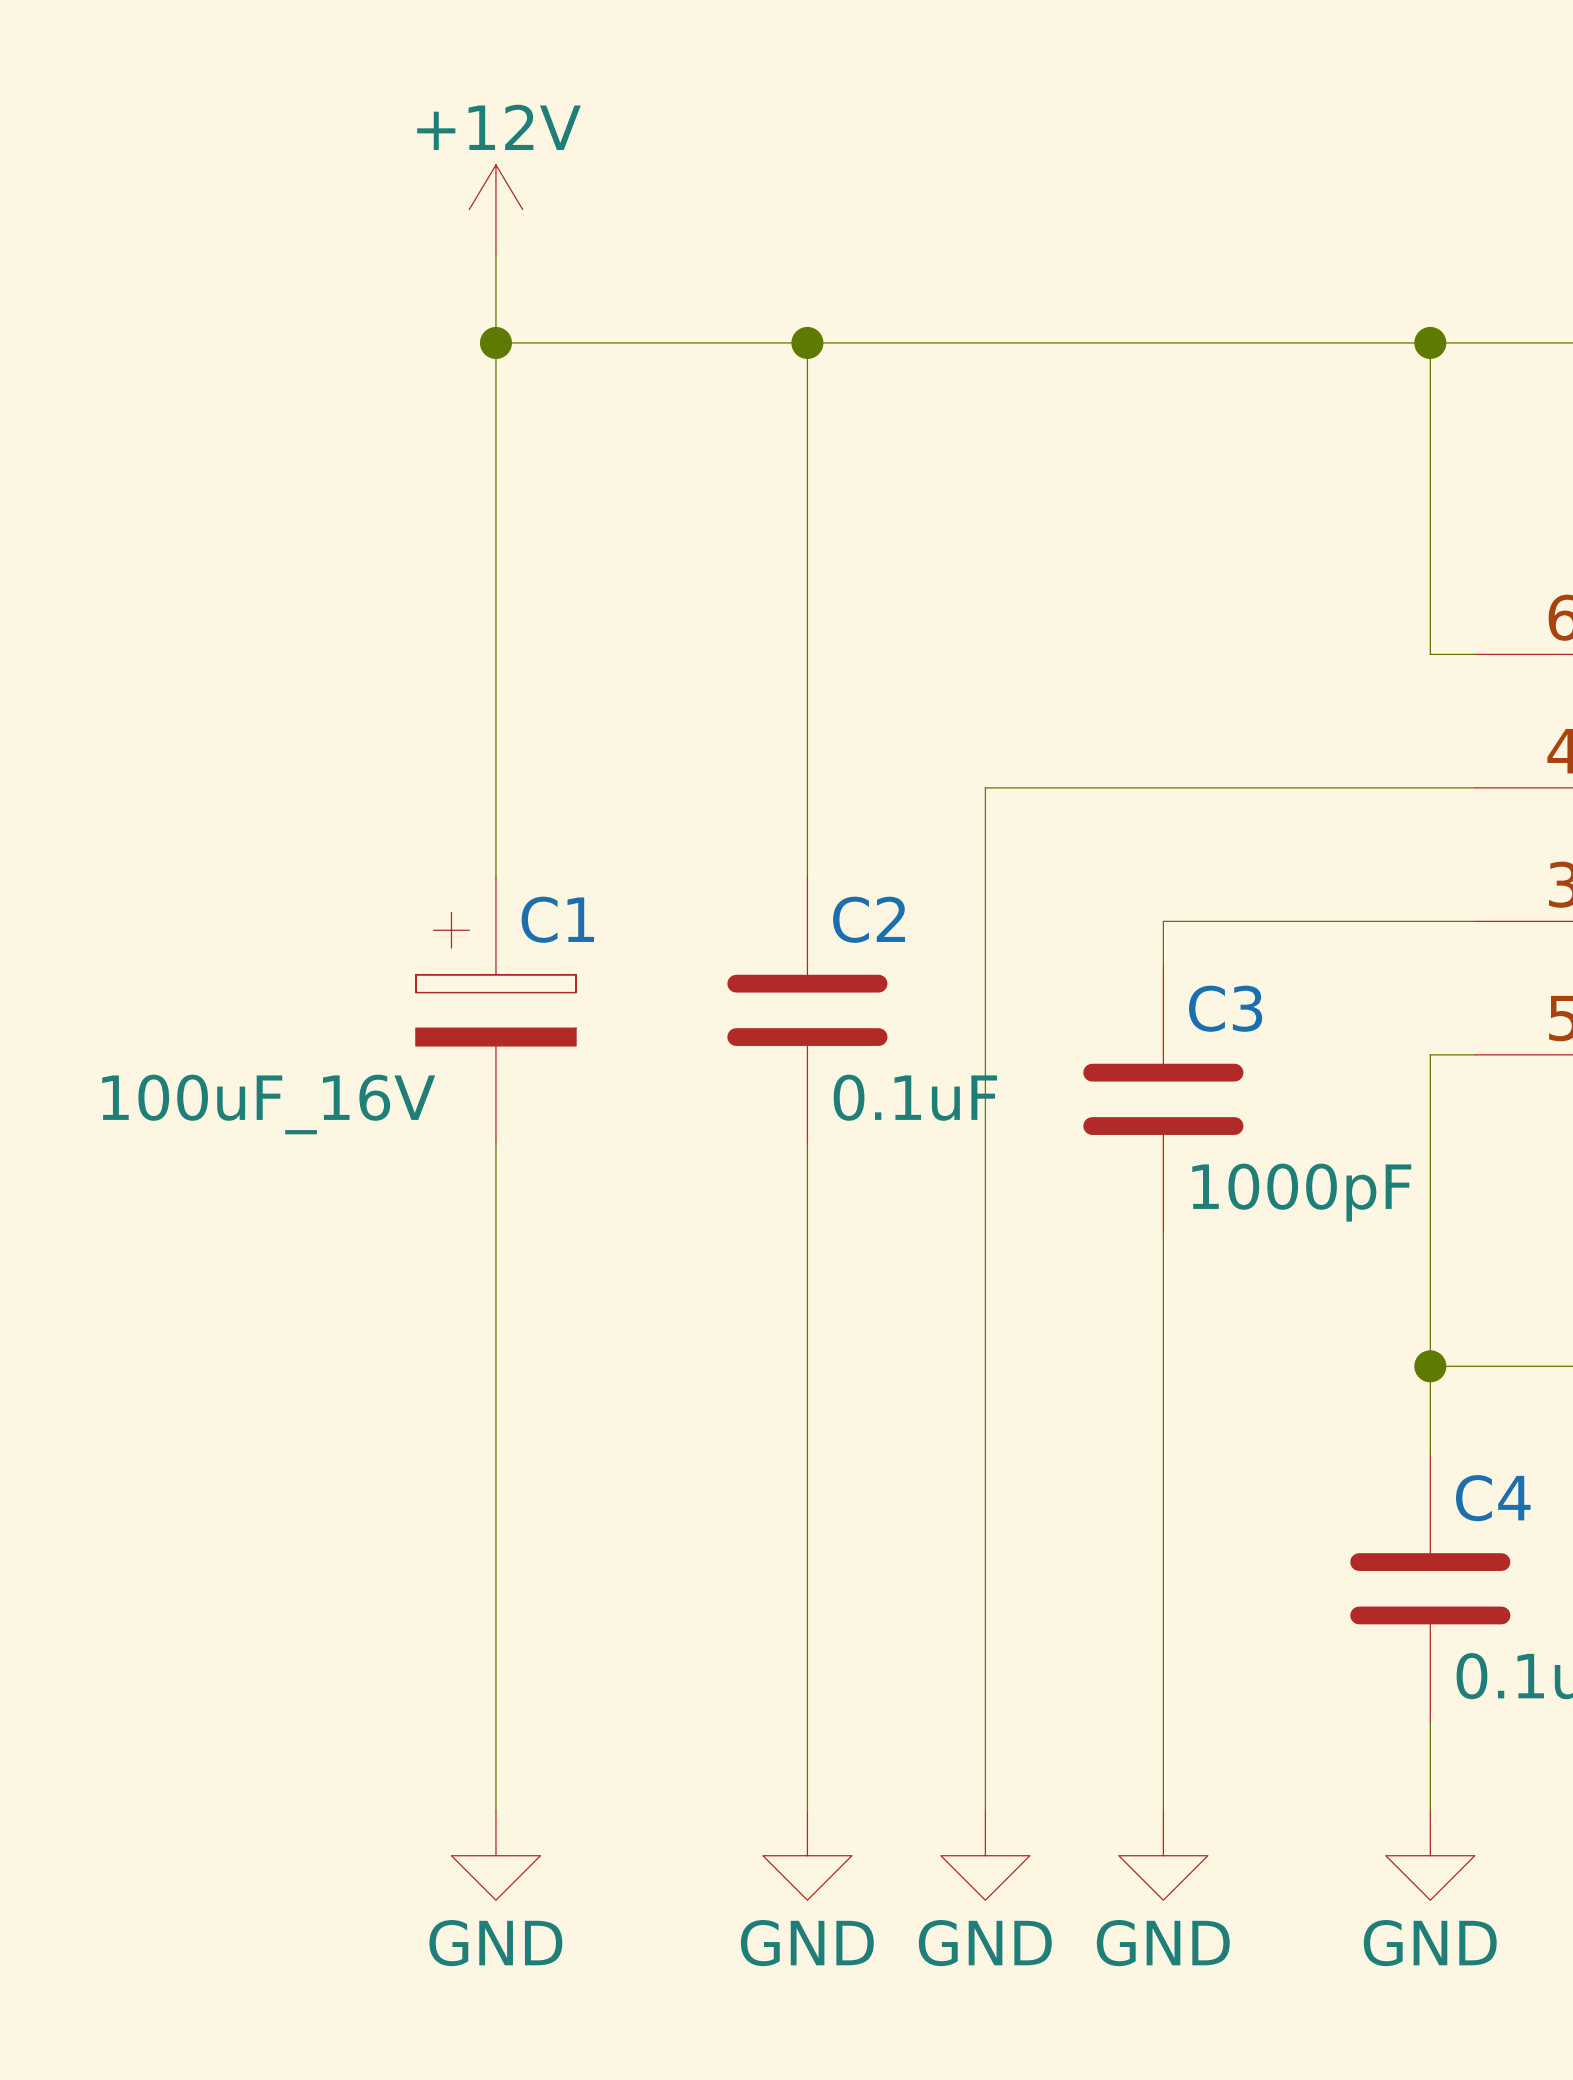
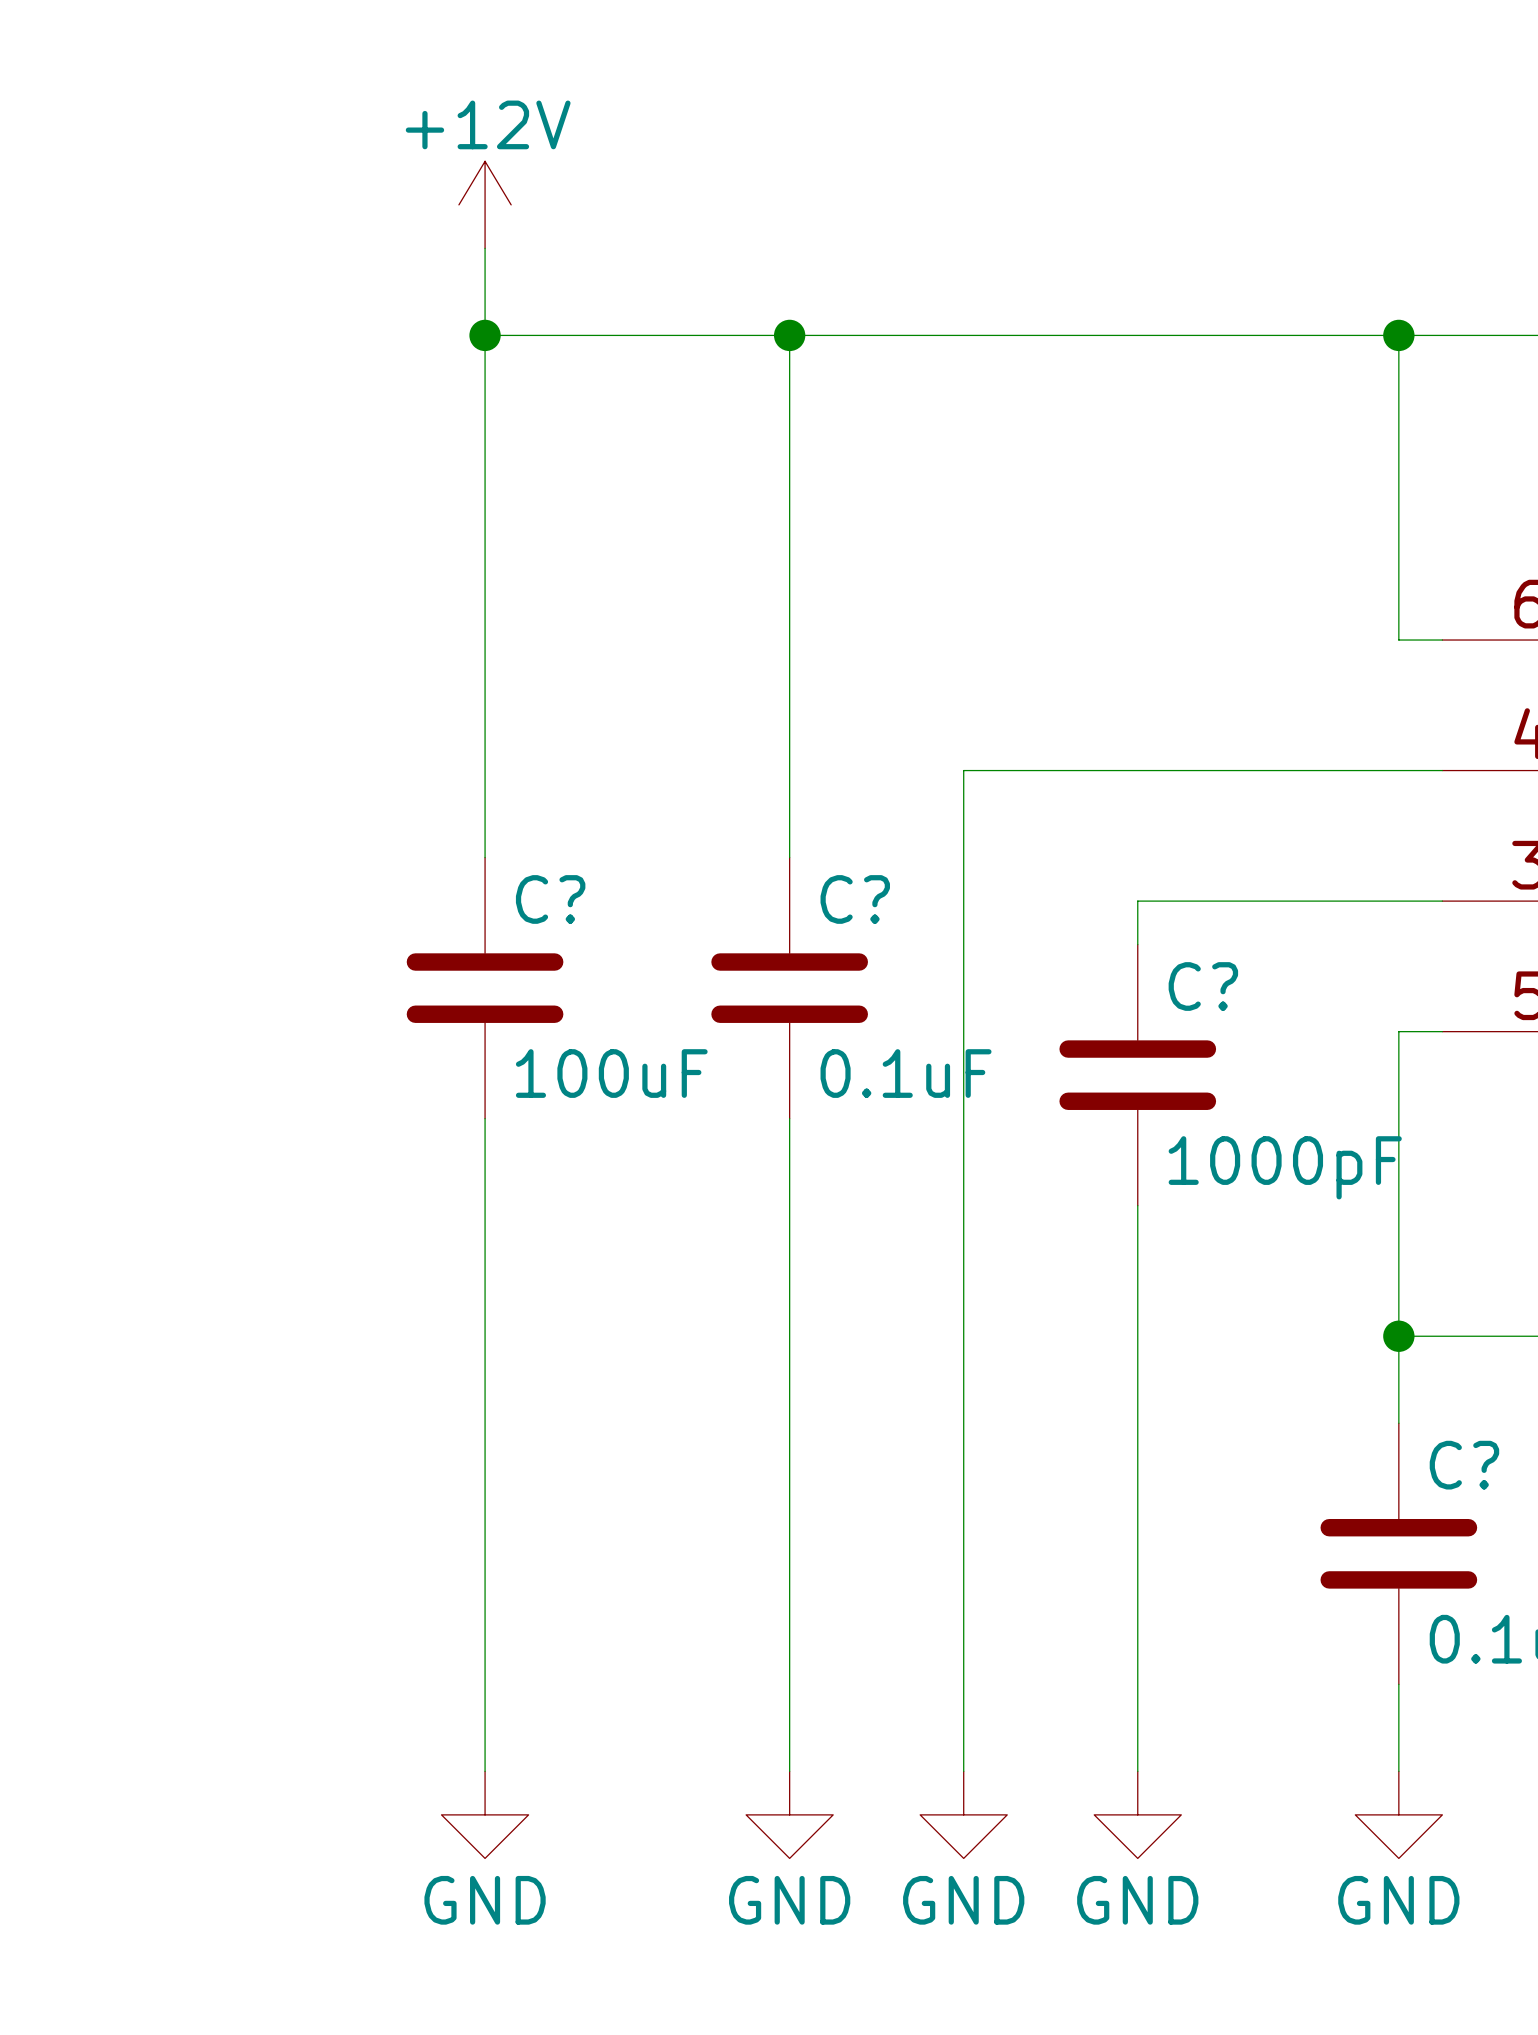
C2 name: C2 (869, 919) -> C? (855, 899)
C3 name: C3 (1225, 1008) -> C? (1203, 986)
C1: 100uF_16V (495, 1010) -> none
C?: none -> 100uF (485, 988)
C4 name: C4 (1493, 1498) -> C? (1464, 1465)

